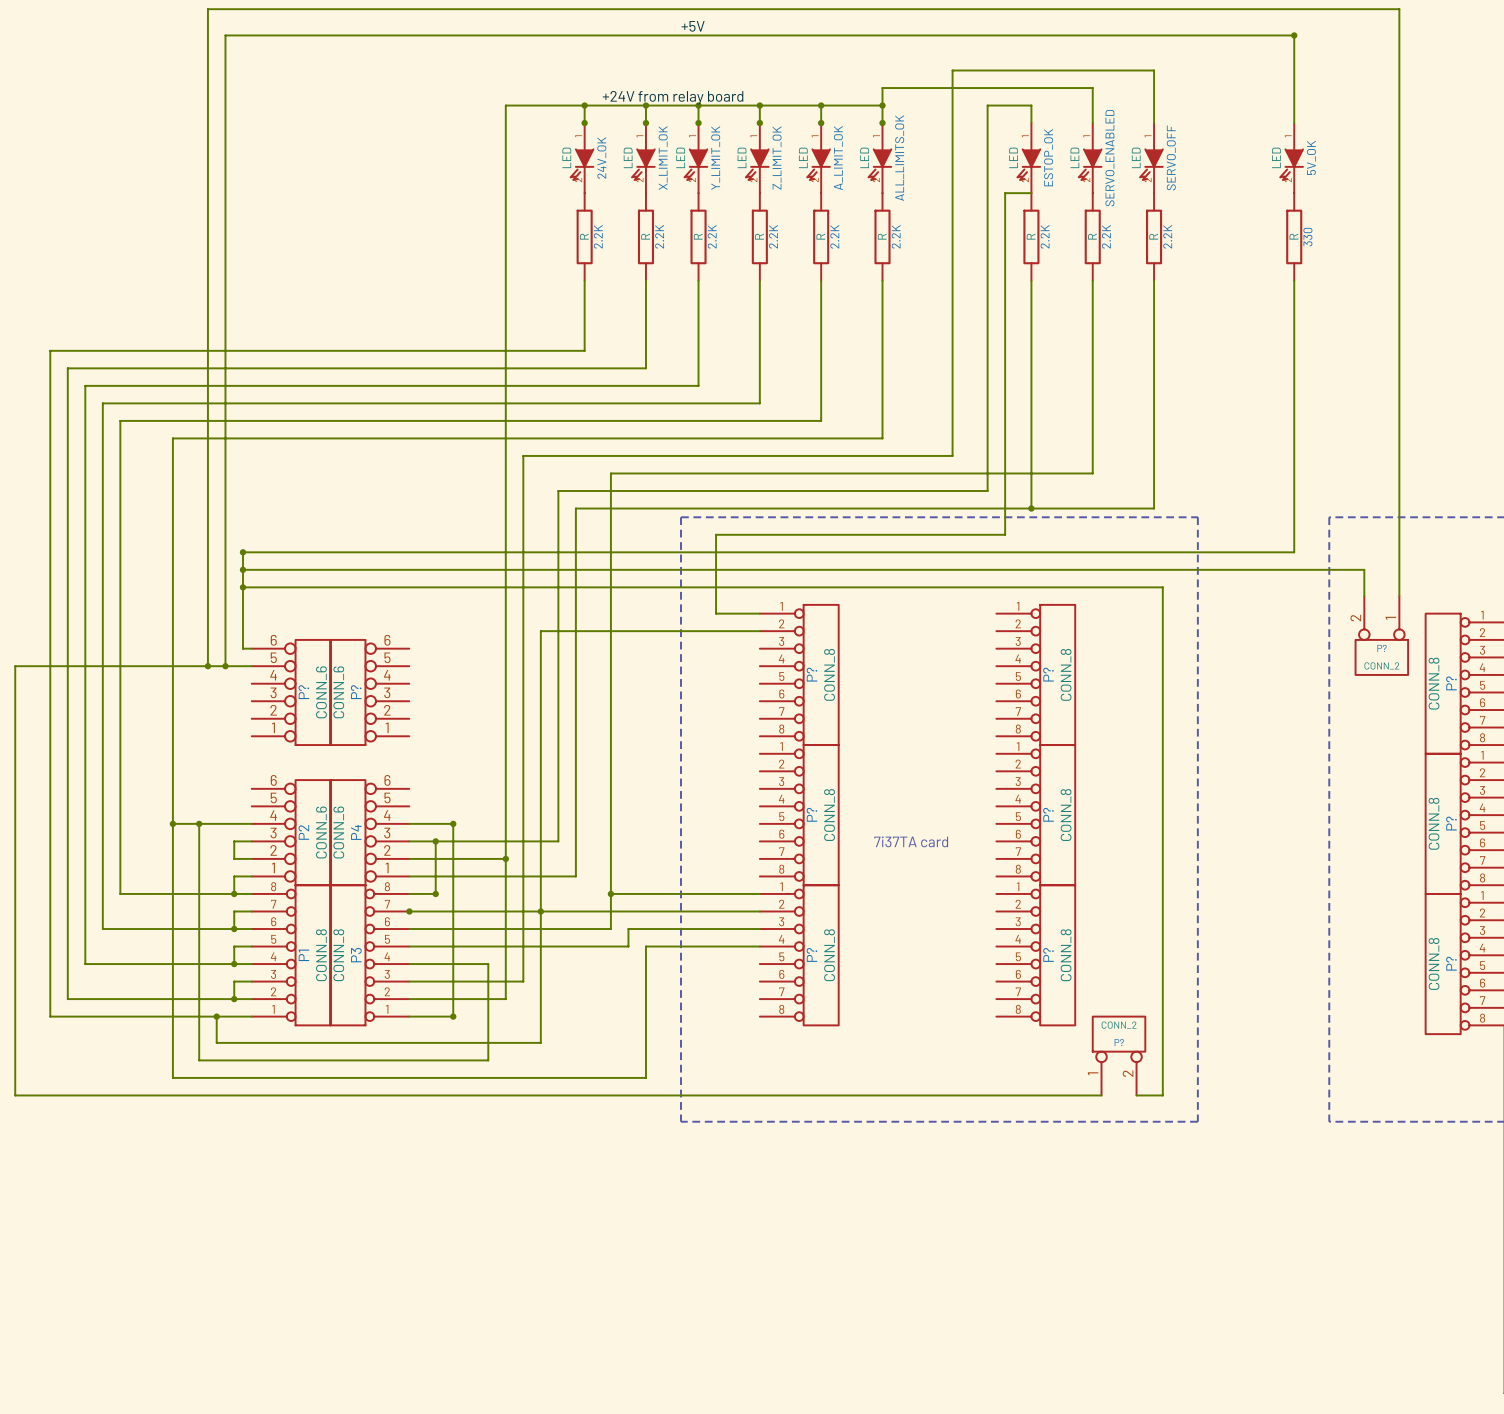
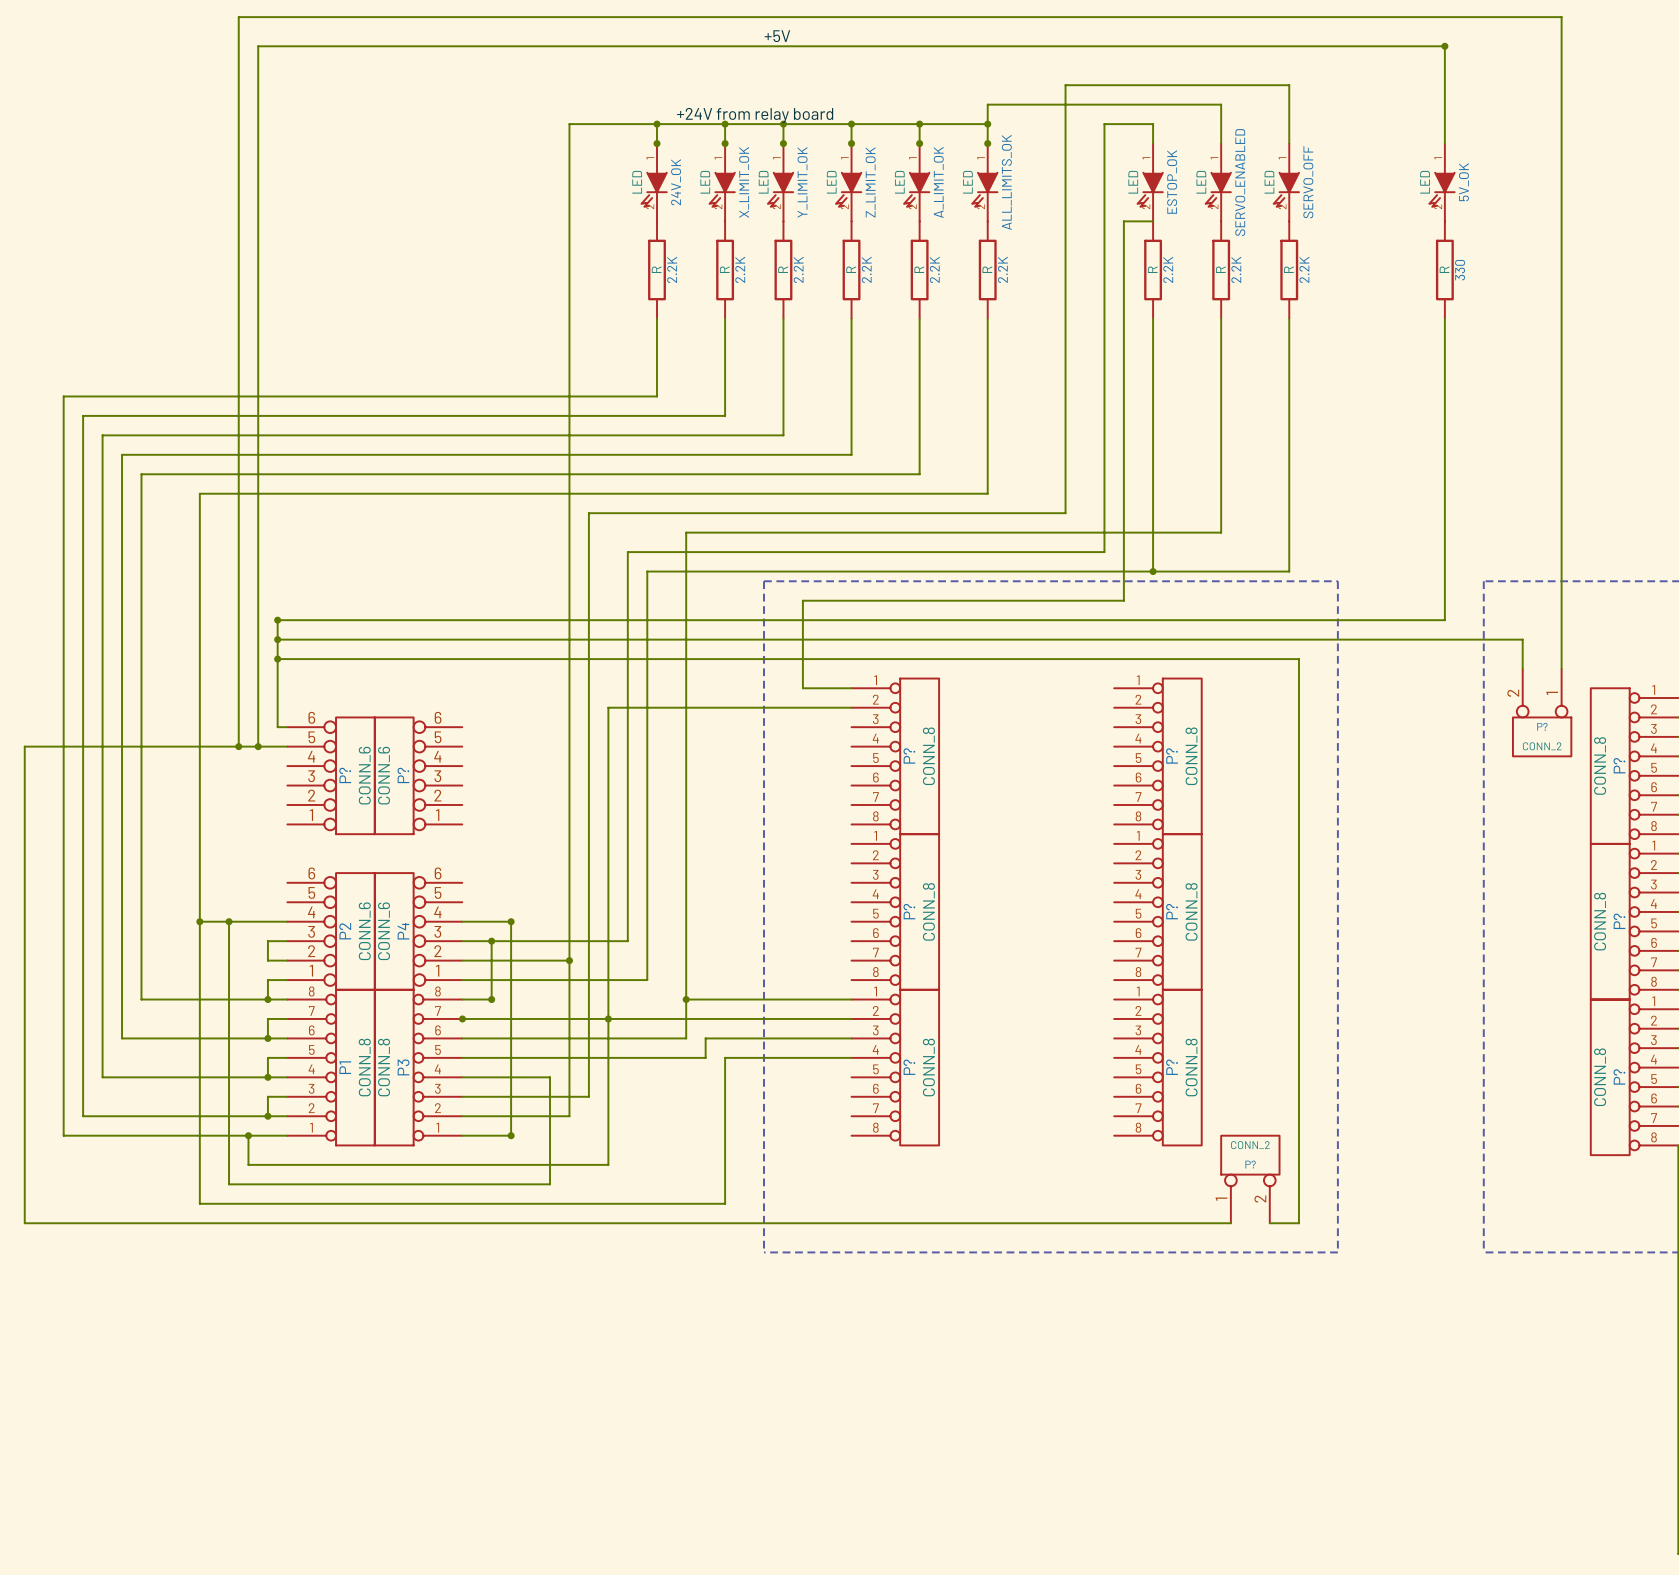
text: 7i37TA card (911, 841) -> none

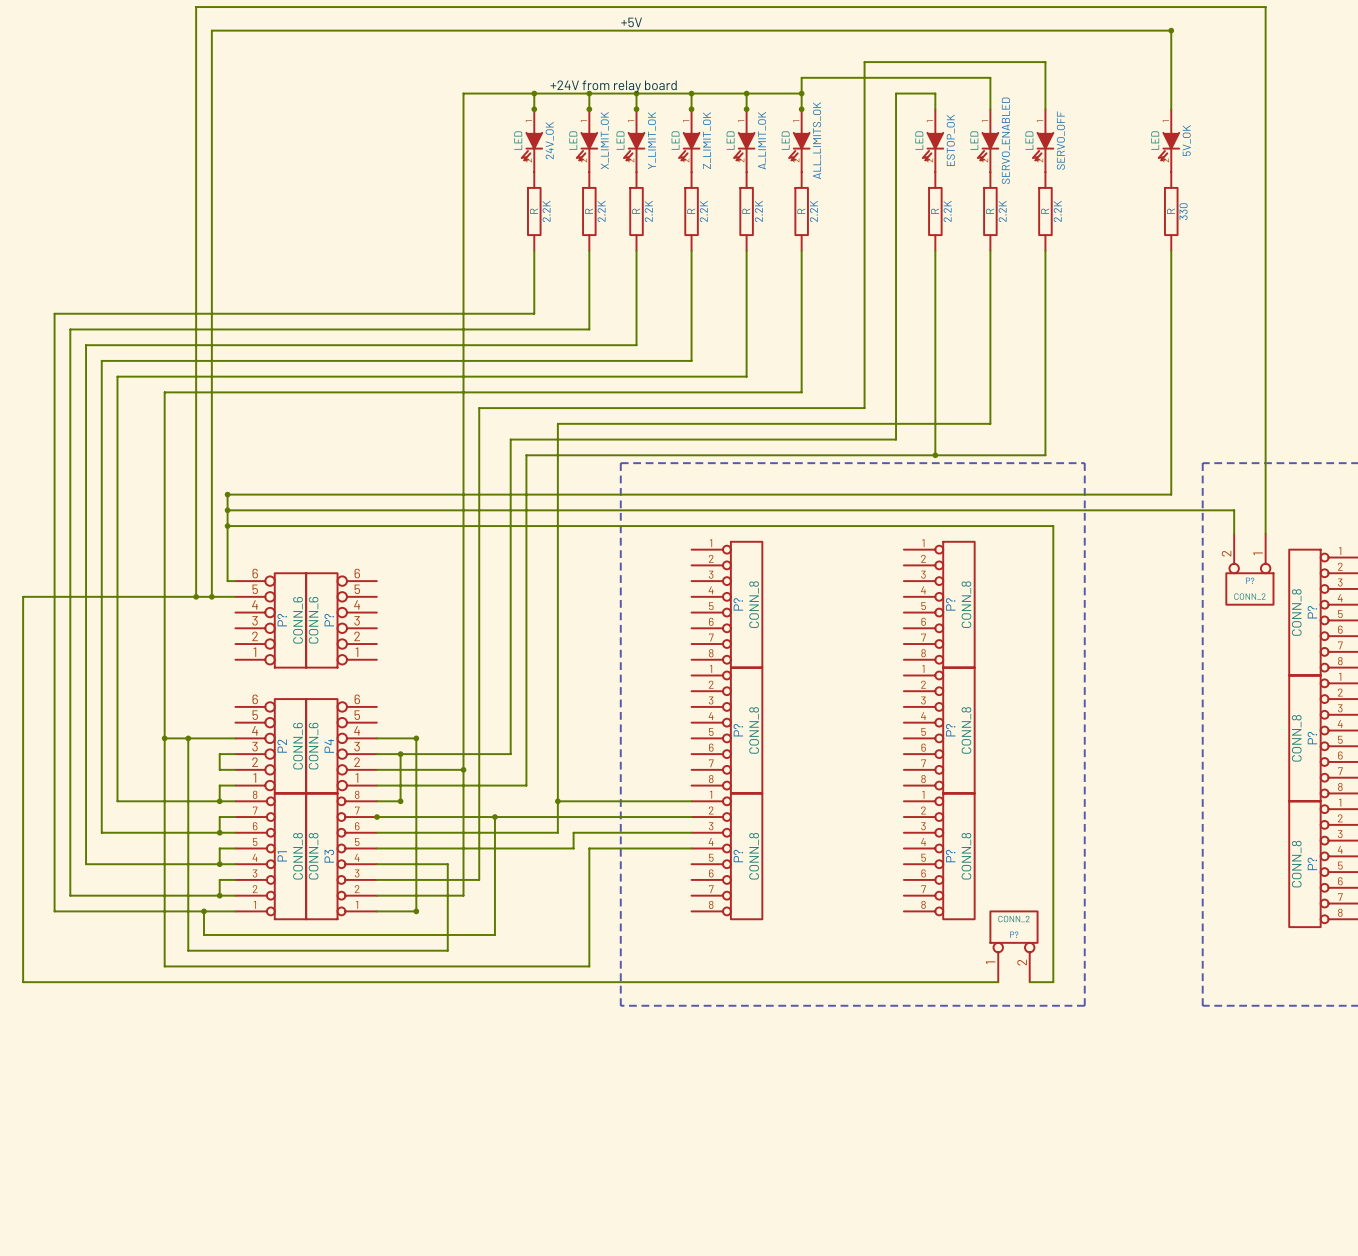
wire: (1153, 221) (1123, 221) (1123, 600) (802, 600) (802, 688) (851, 688) -> none
wire: (851, 707) (608, 707) (608, 1018) -> none

